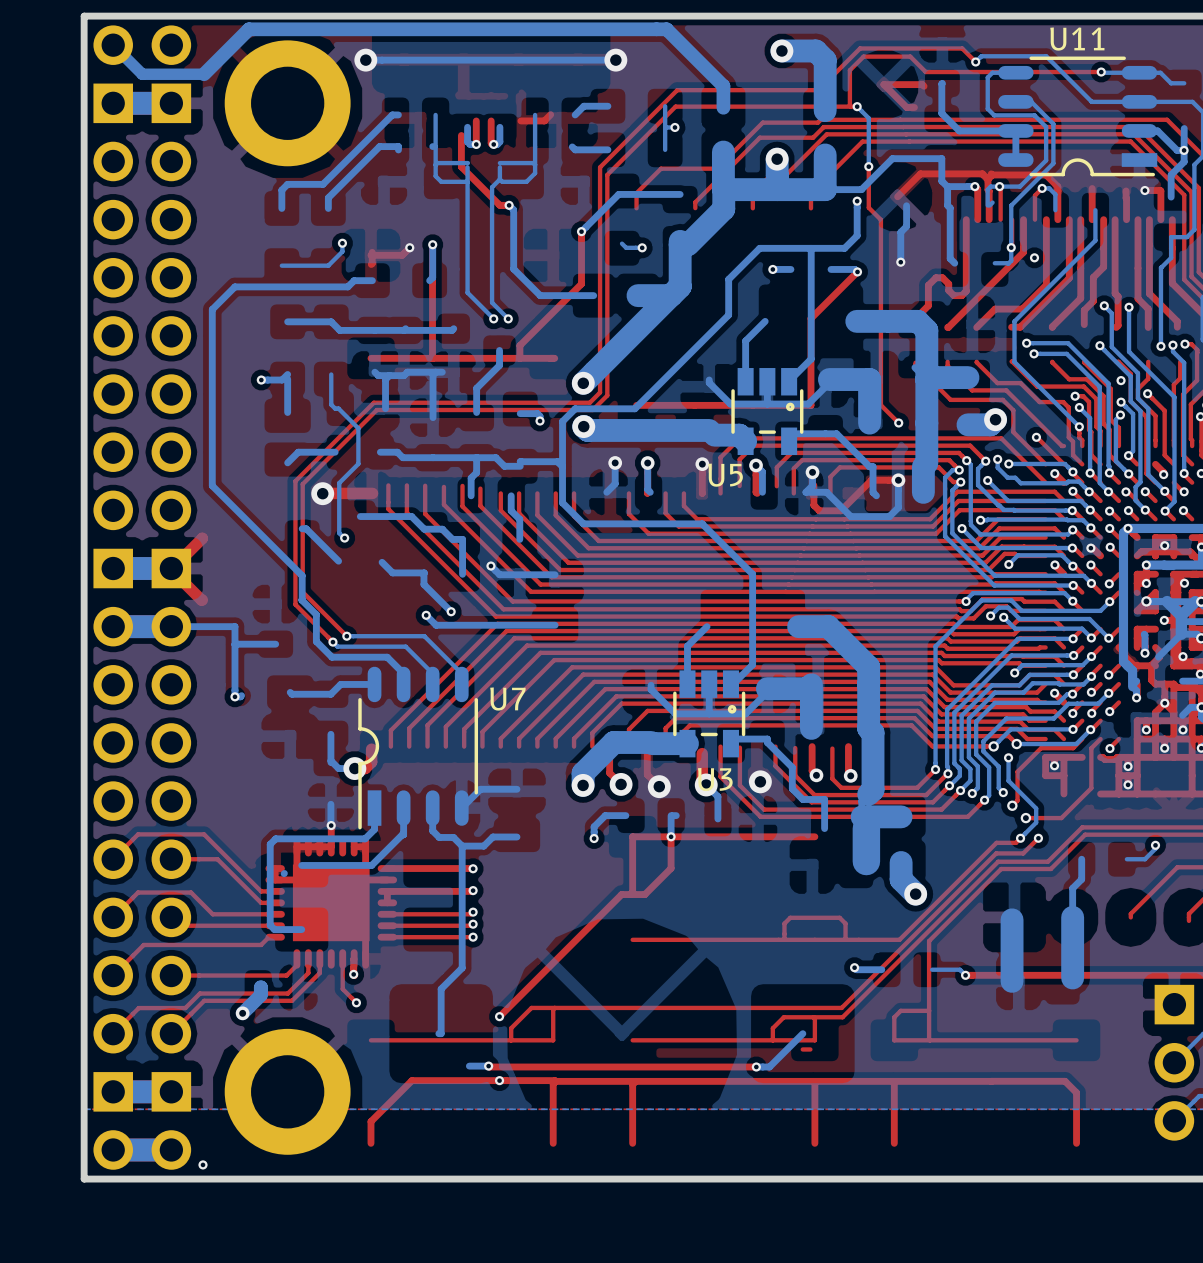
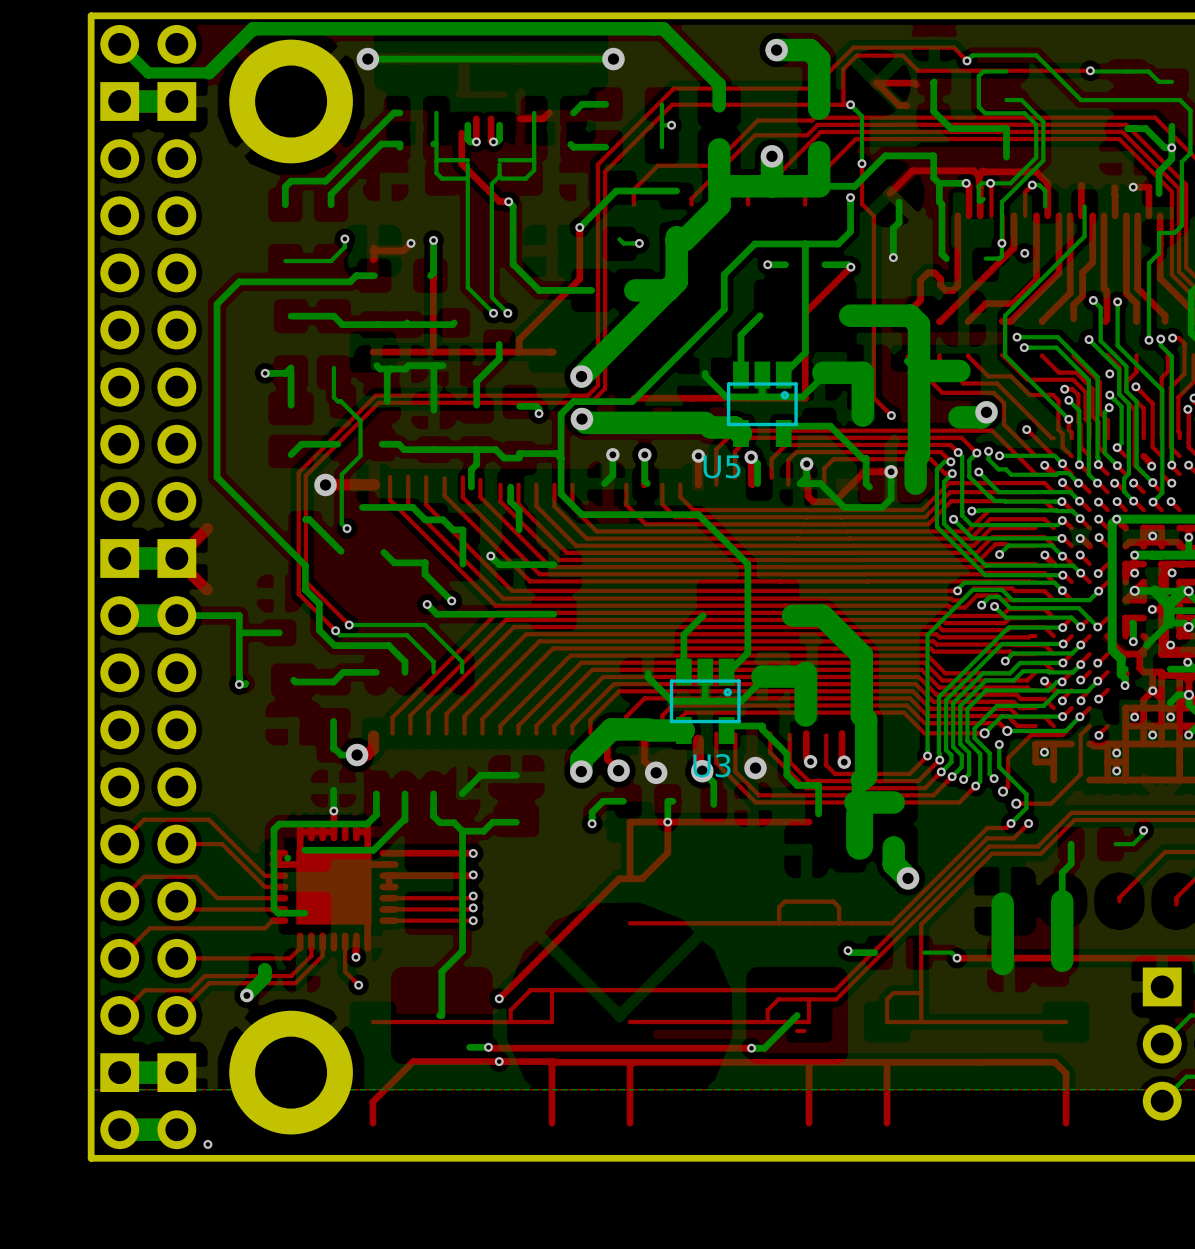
U11: (1077, 116) -> none
U5 footprint: [731, 368, 804, 456] -> [726, 361, 798, 447]
U3 footprint: [673, 670, 746, 758] -> [669, 658, 741, 745]
U7: (418, 748) -> none

